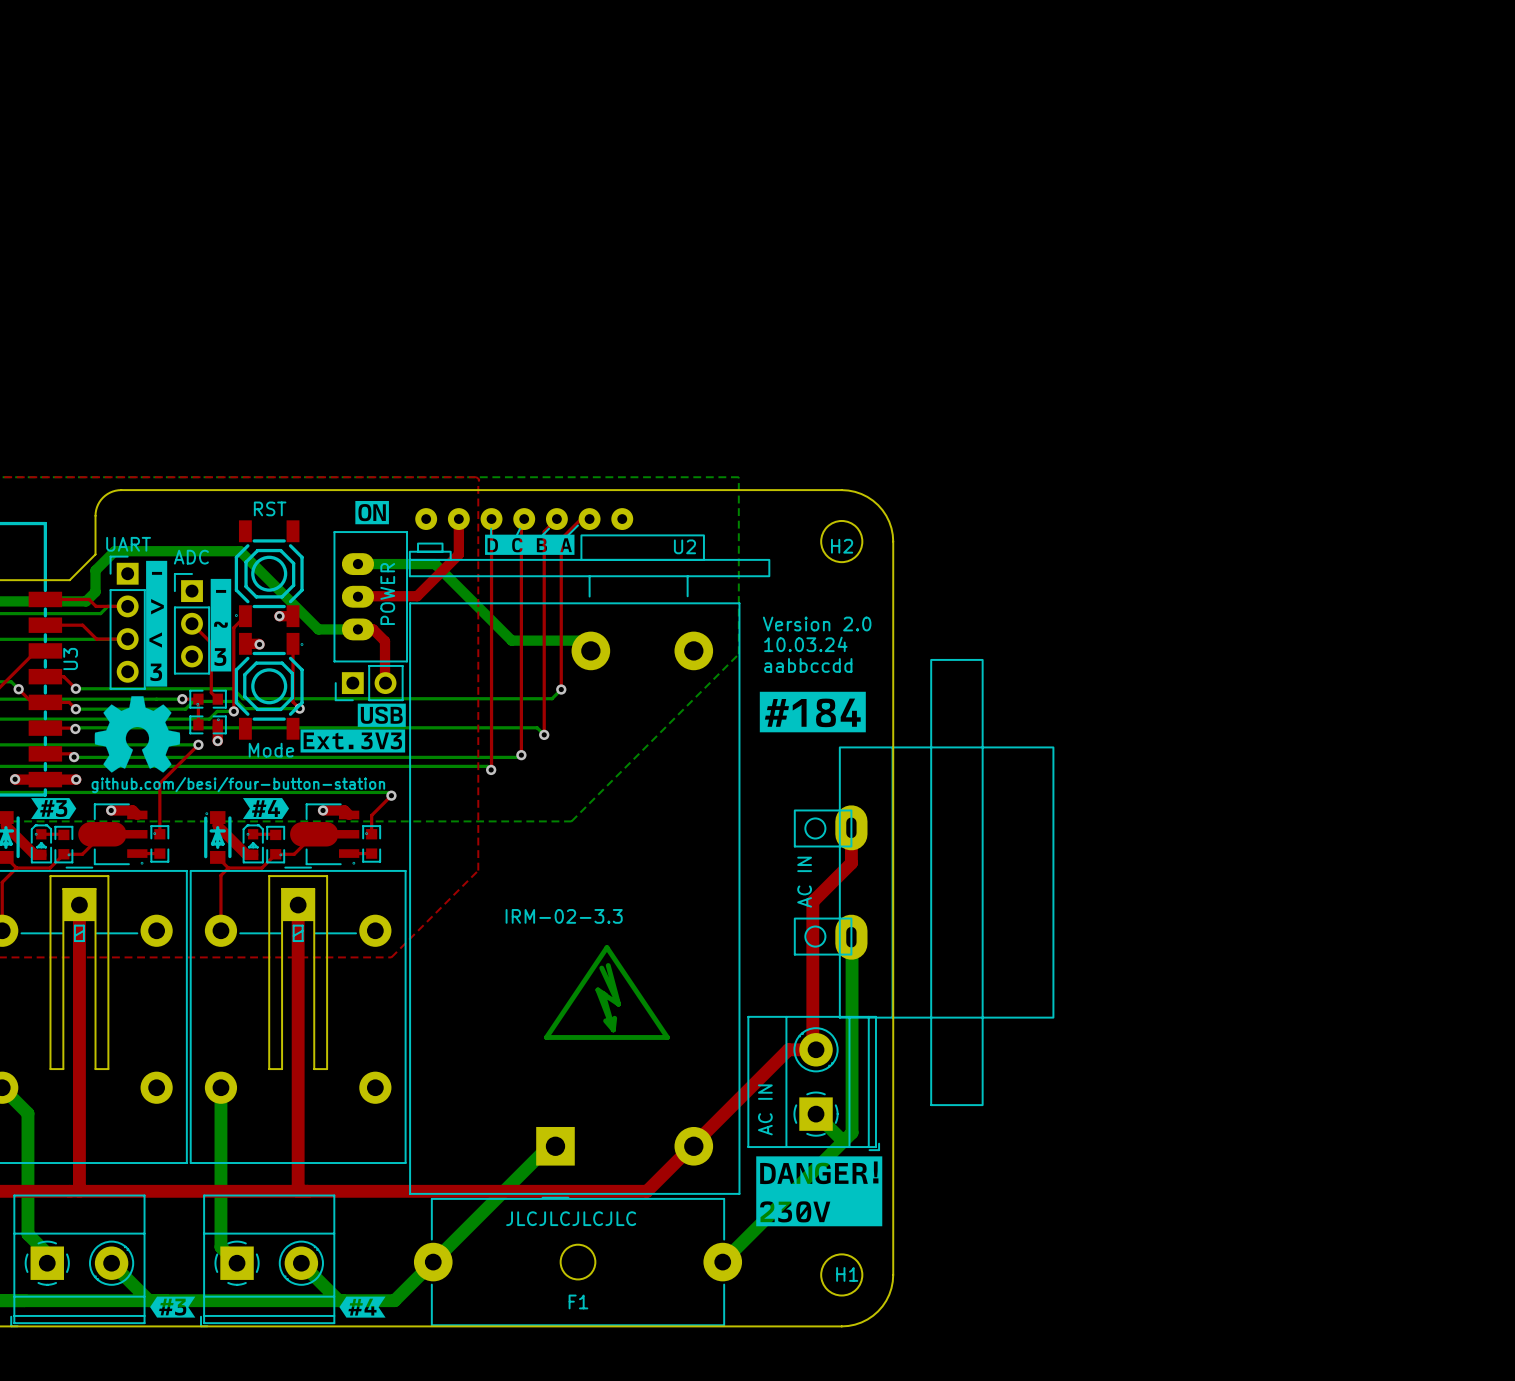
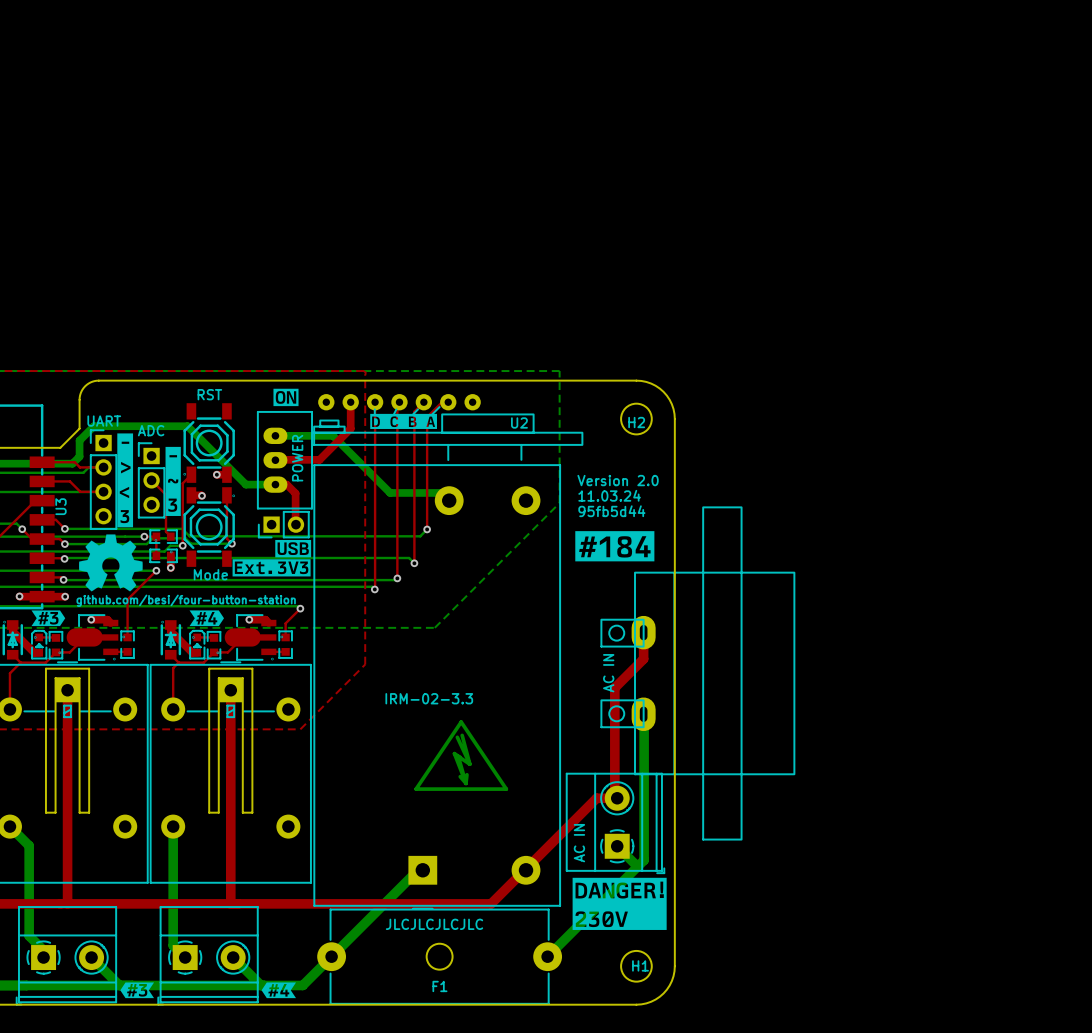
text: 10.03.24 (805, 644) -> 11.03.24 (609, 495)
text: aabbccdd (808, 665) -> 95fb5d44 (611, 511)

